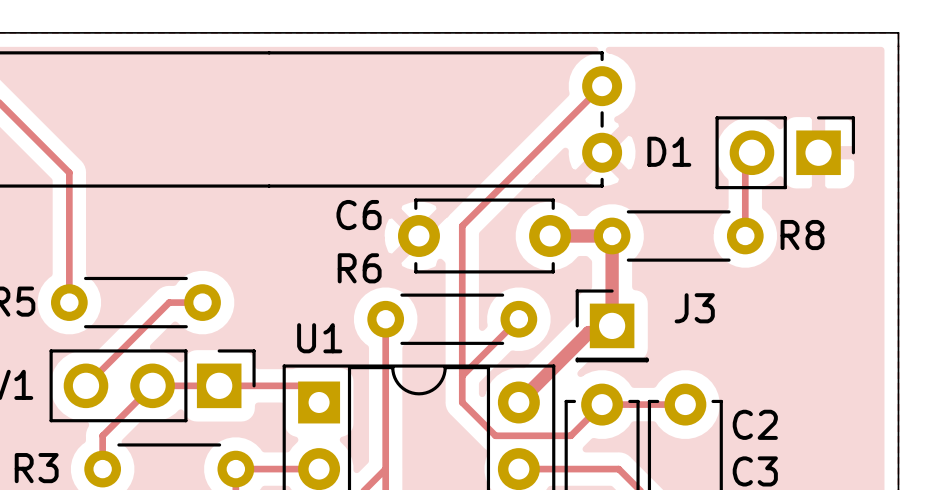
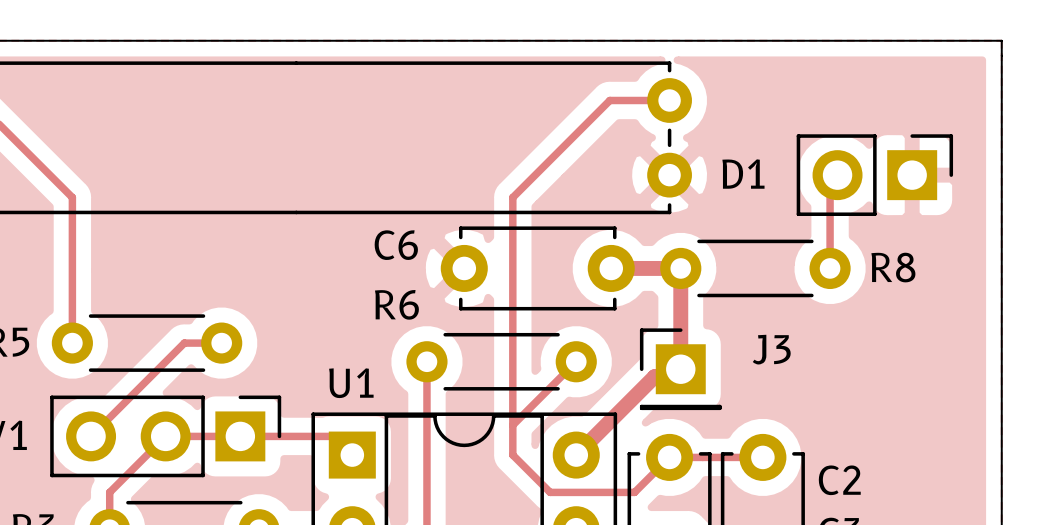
track: (602, 86) (462, 226) -> (669, 100) (609, 100) (512, 197) (512, 257)

